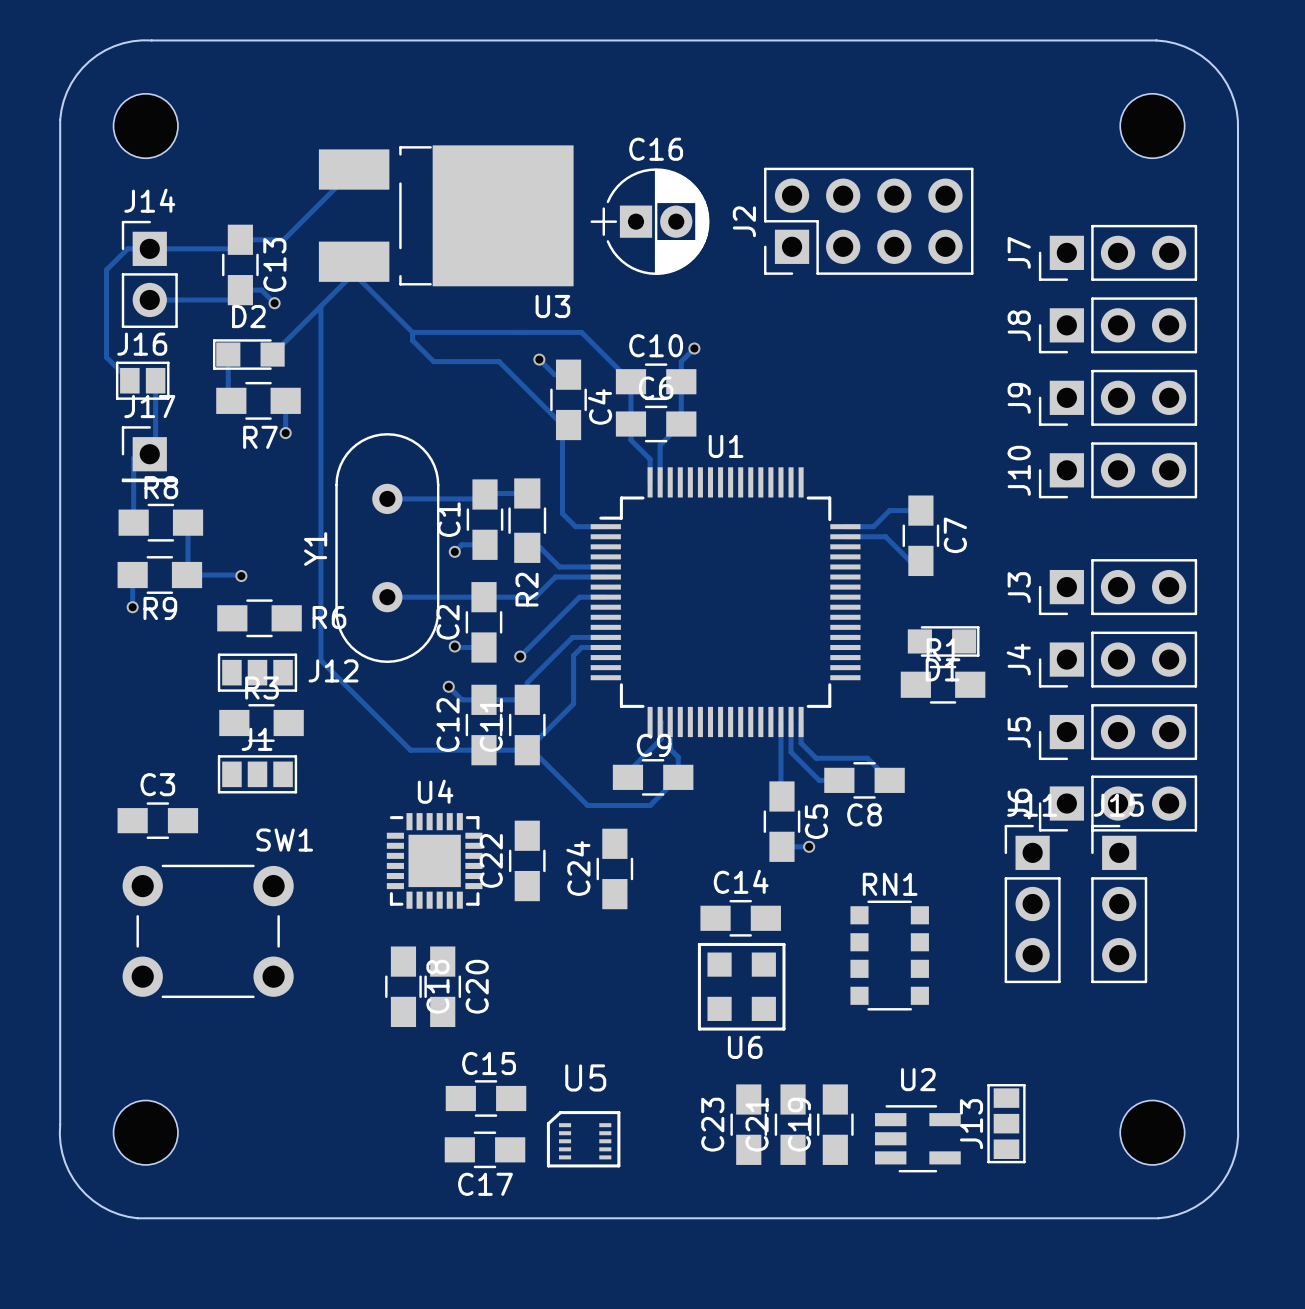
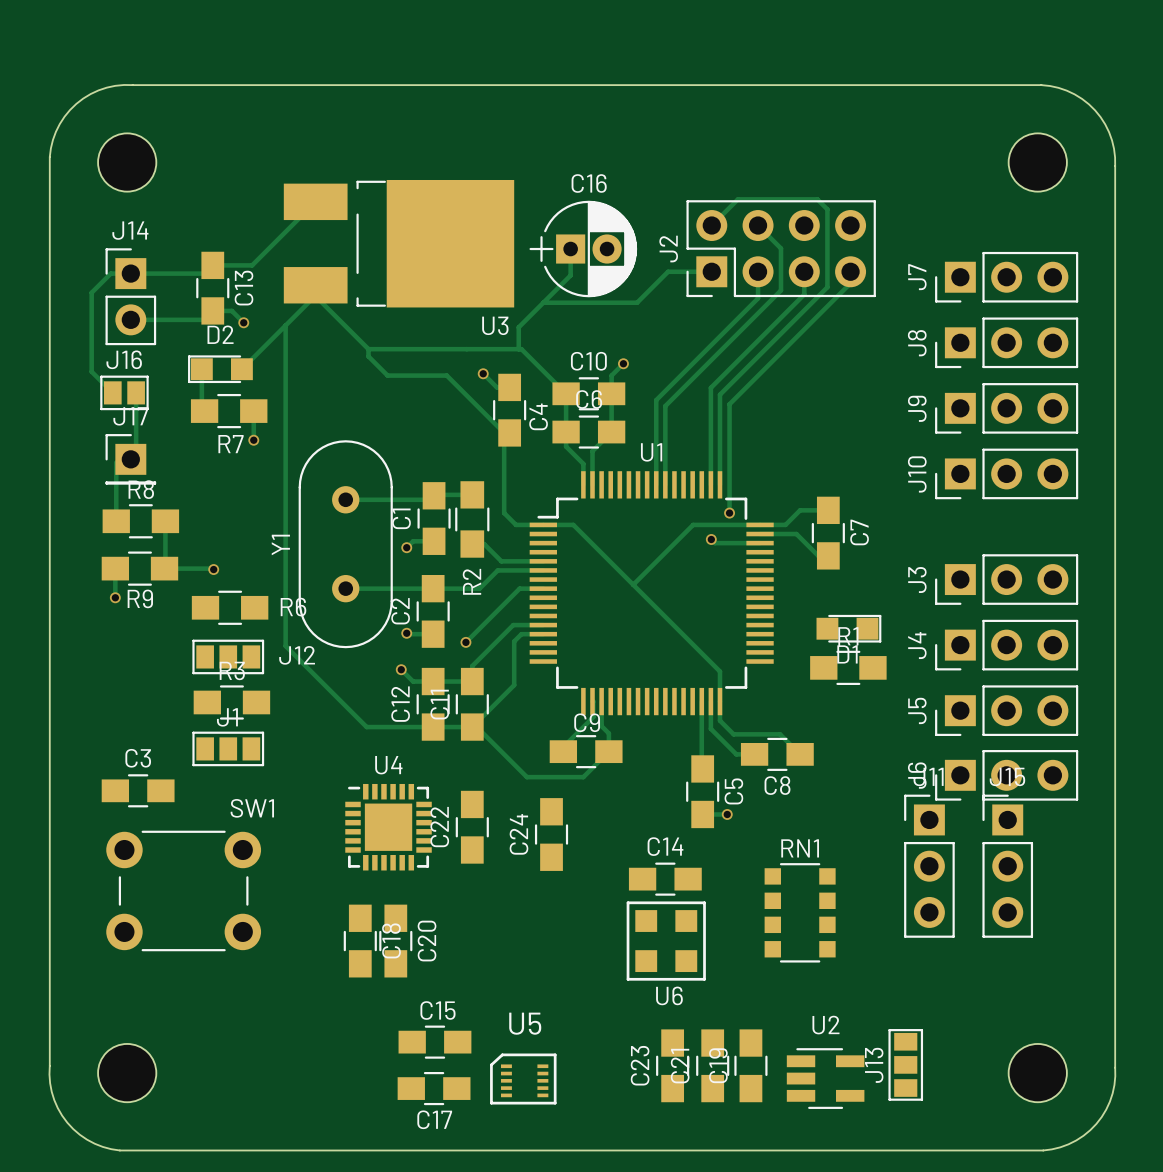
track: none -> (711, 225) (737, 199) (817, 199) (827, 209) (827, 287) (719, 394) (719, 484)
track: none -> (758, 225) (780, 248) (780, 290) (665, 406) (665, 484)
track: none -> (570, 249) (570, 275) (518, 327) (518, 349)
track: none -> (711, 271) (668, 271) (637, 302) (543, 302)
track: none -> (758, 271) (758, 298) (656, 400) (656, 484)
track: none -> (804, 271) (804, 294) (710, 387) (710, 484)
track: none -> (850, 271) (850, 283) (729, 404) (729, 513)
via: none -> (729, 513)
track: none -> (543, 524) (573, 524) (719, 671) (719, 701)
track: none -> (760, 524) (693, 524) (633, 584)
track: none -> (711, 539) (714, 543) (760, 543)
via: none -> (711, 539)

